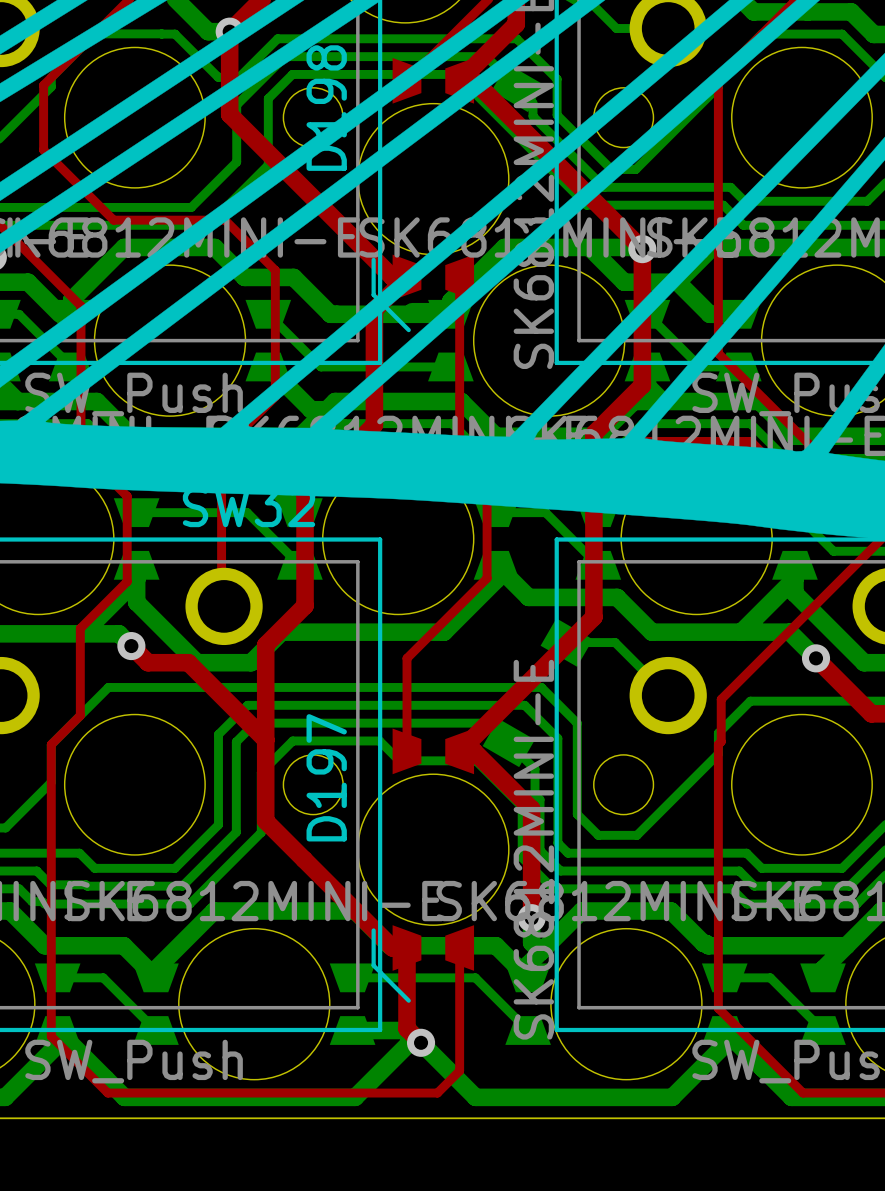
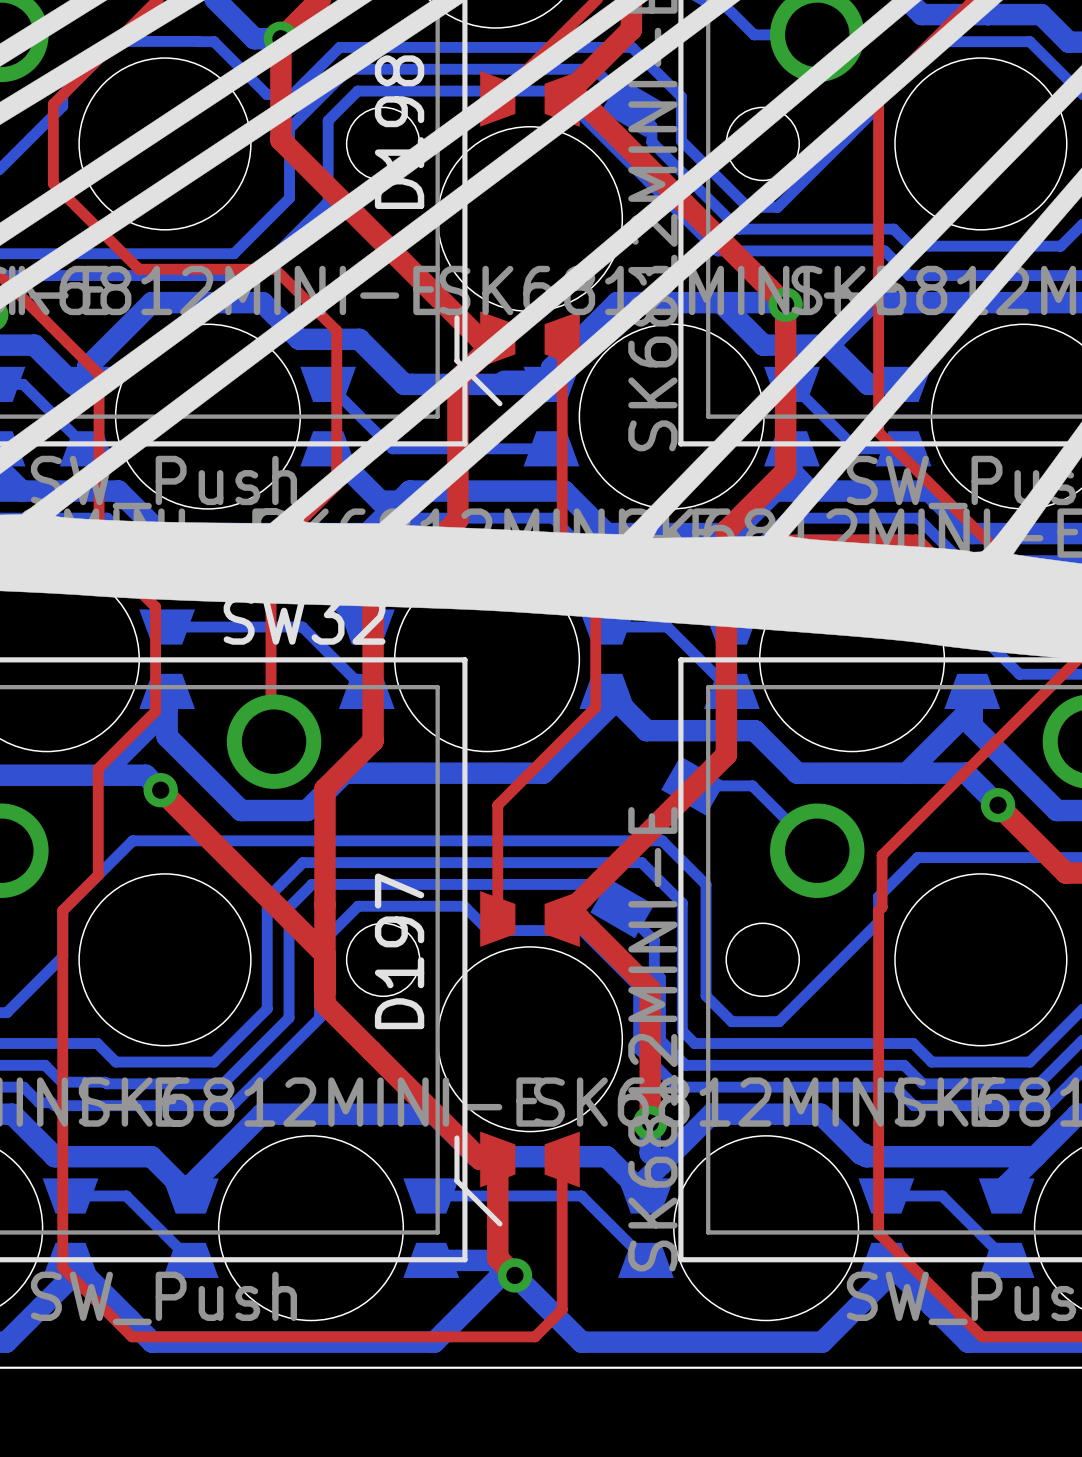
top track: (148, 662) (188, 662) (265, 739) -> (181, 810) (324, 954)

